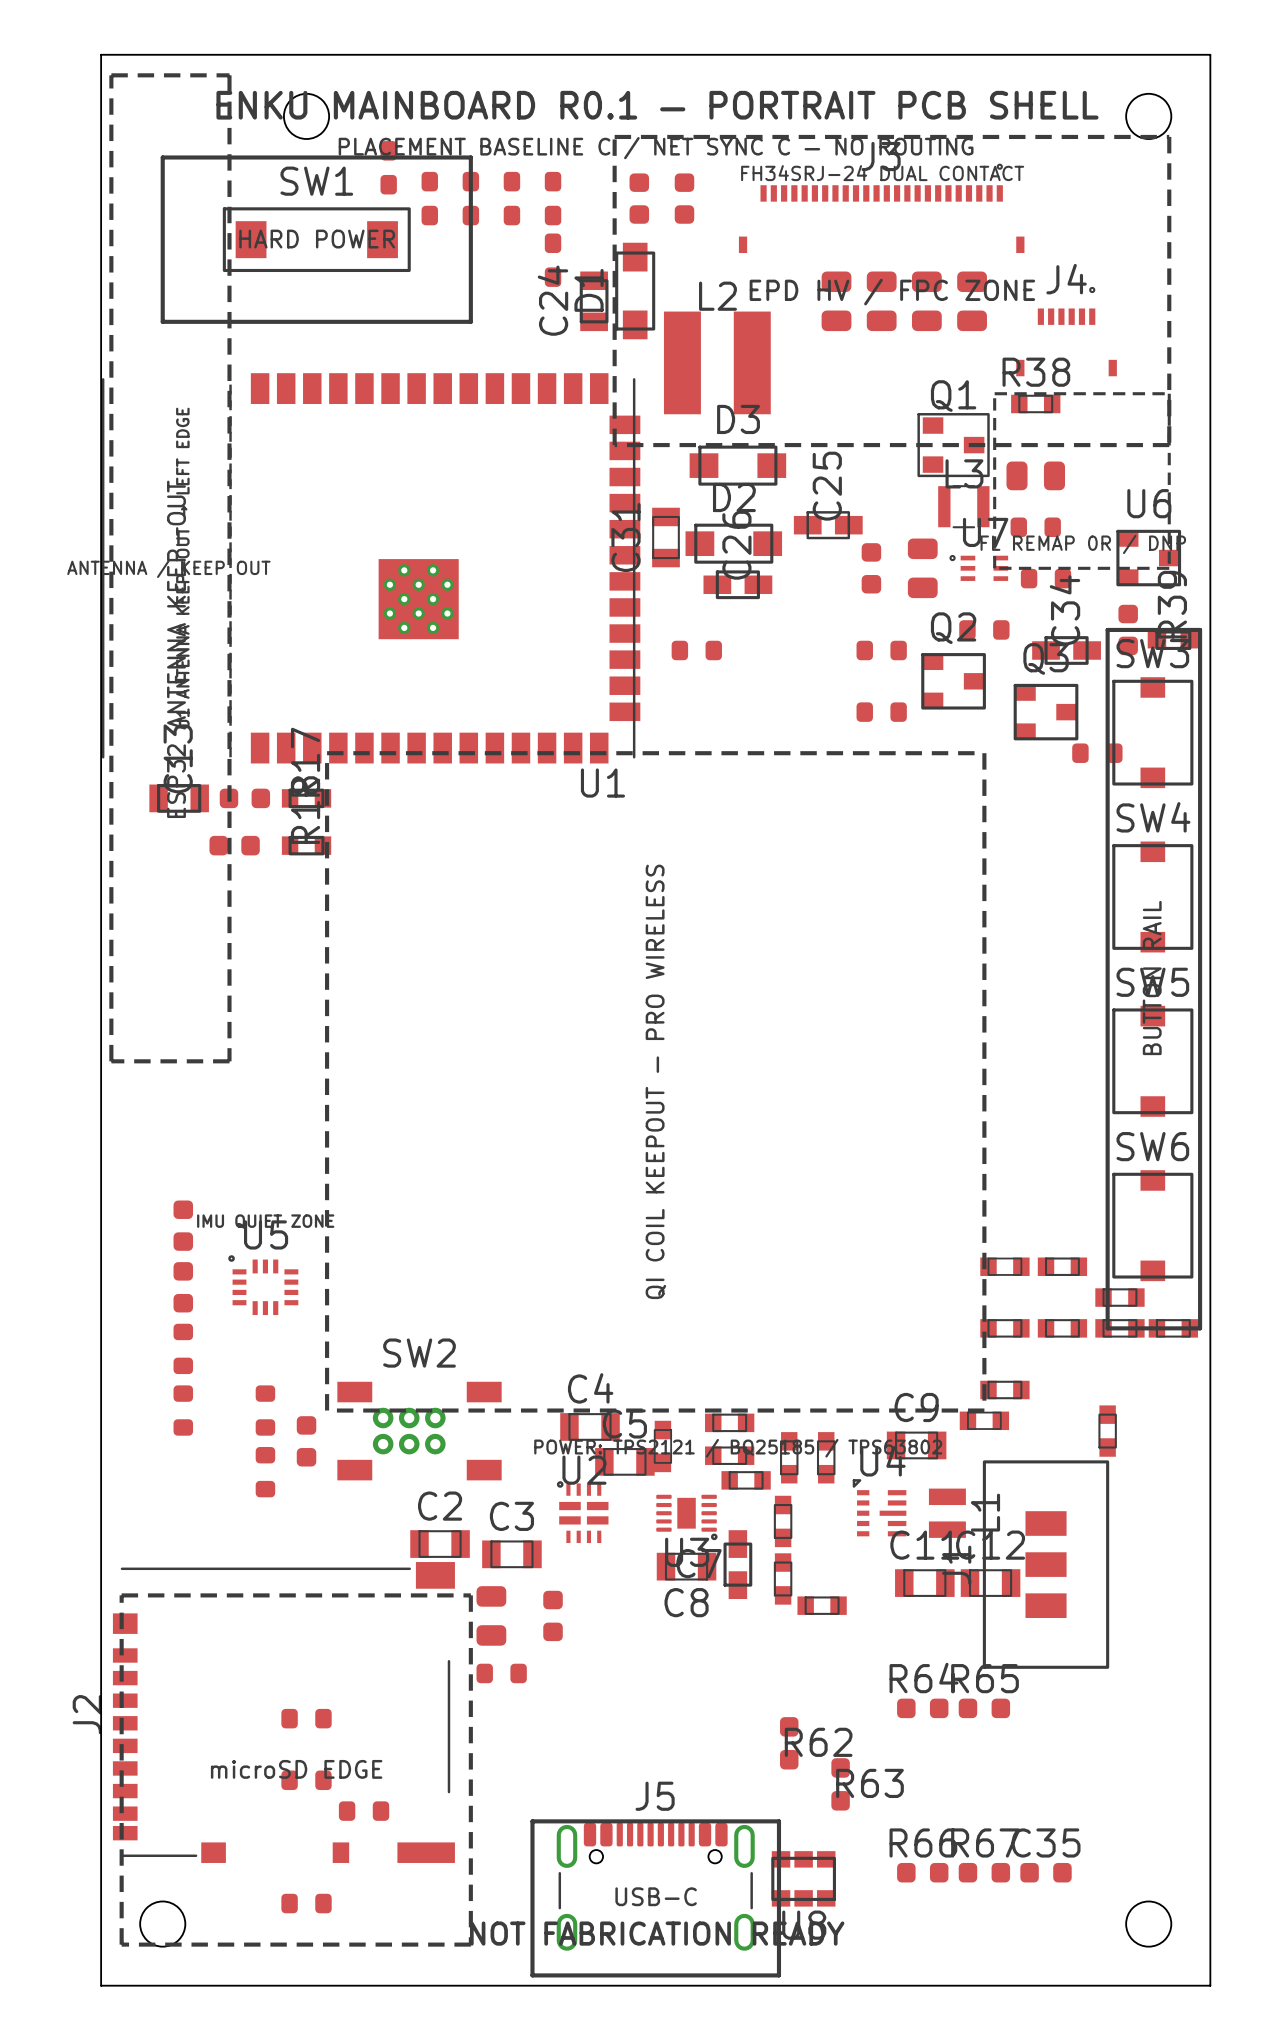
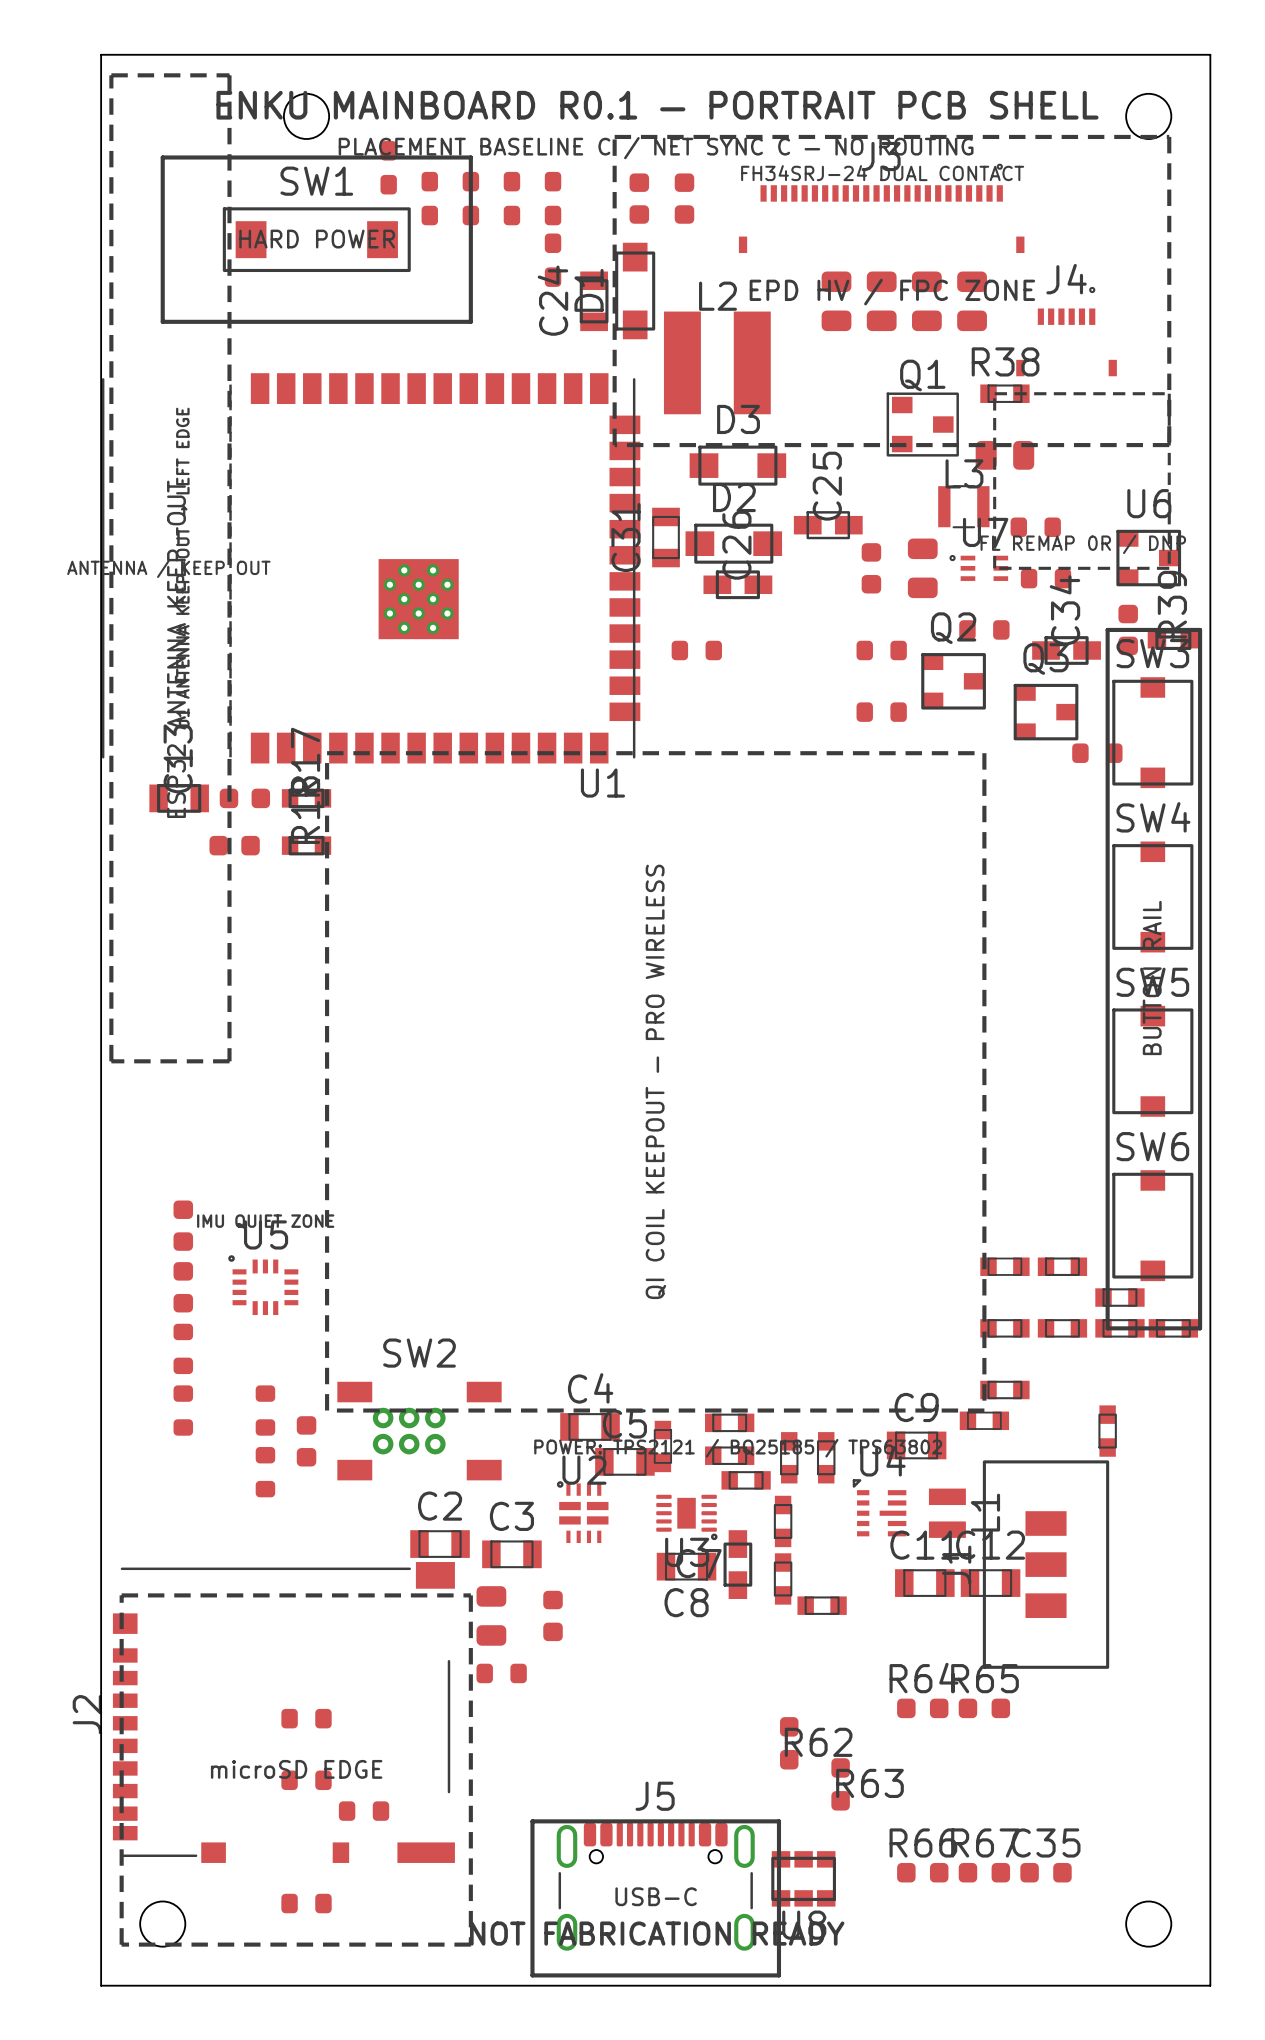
R38 position: (1035, 403) -> (1004, 393)
Q1 position: (953, 445) -> (922, 424)
part position: (1035, 475) -> (1004, 455)

